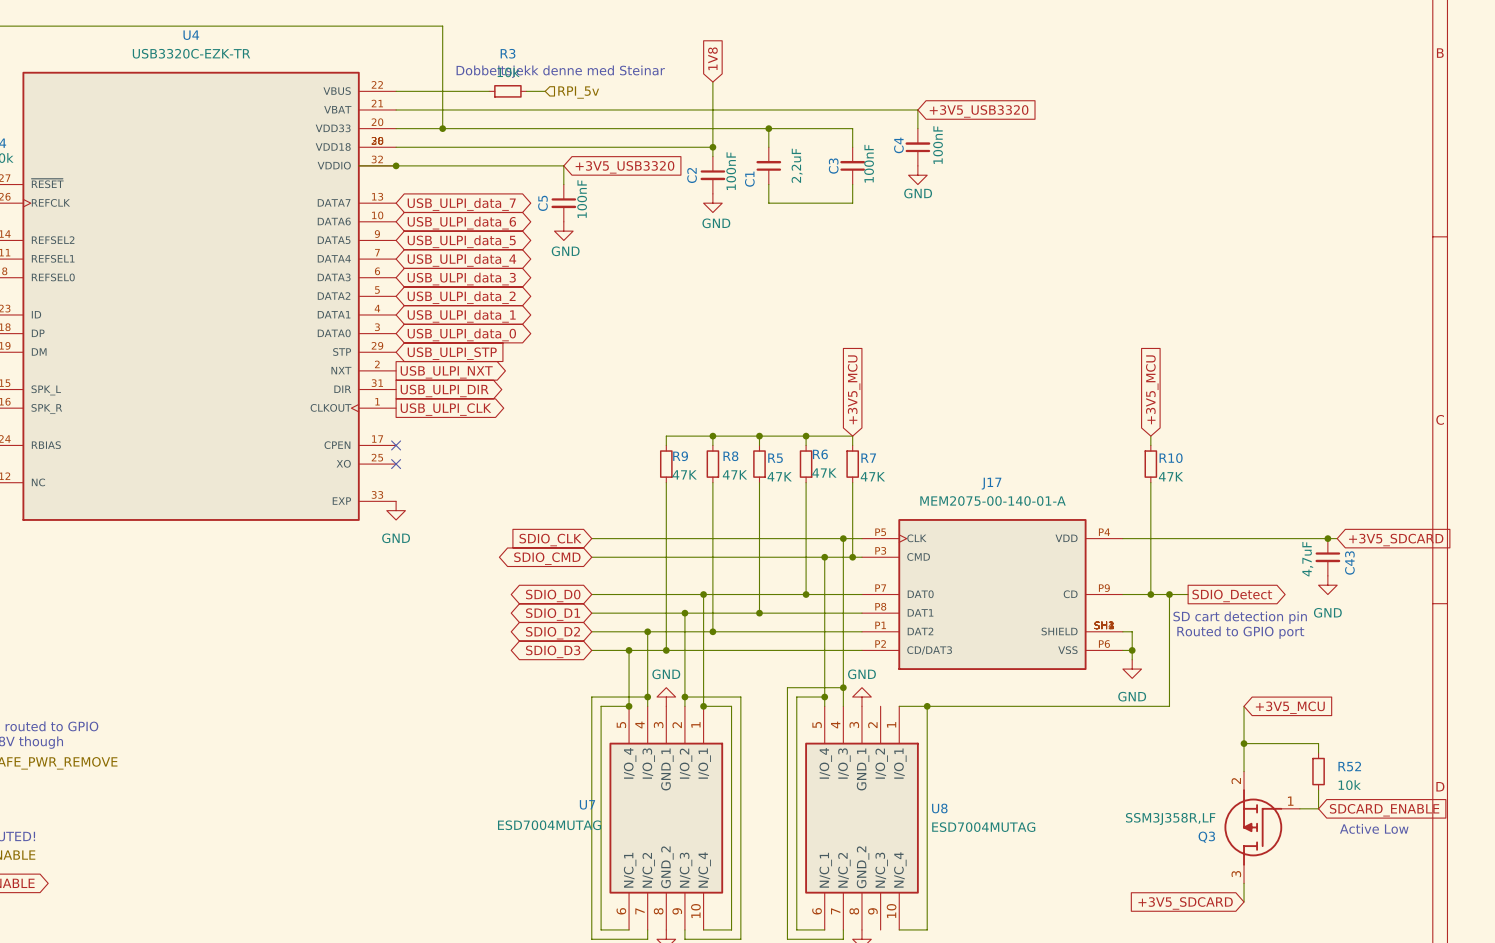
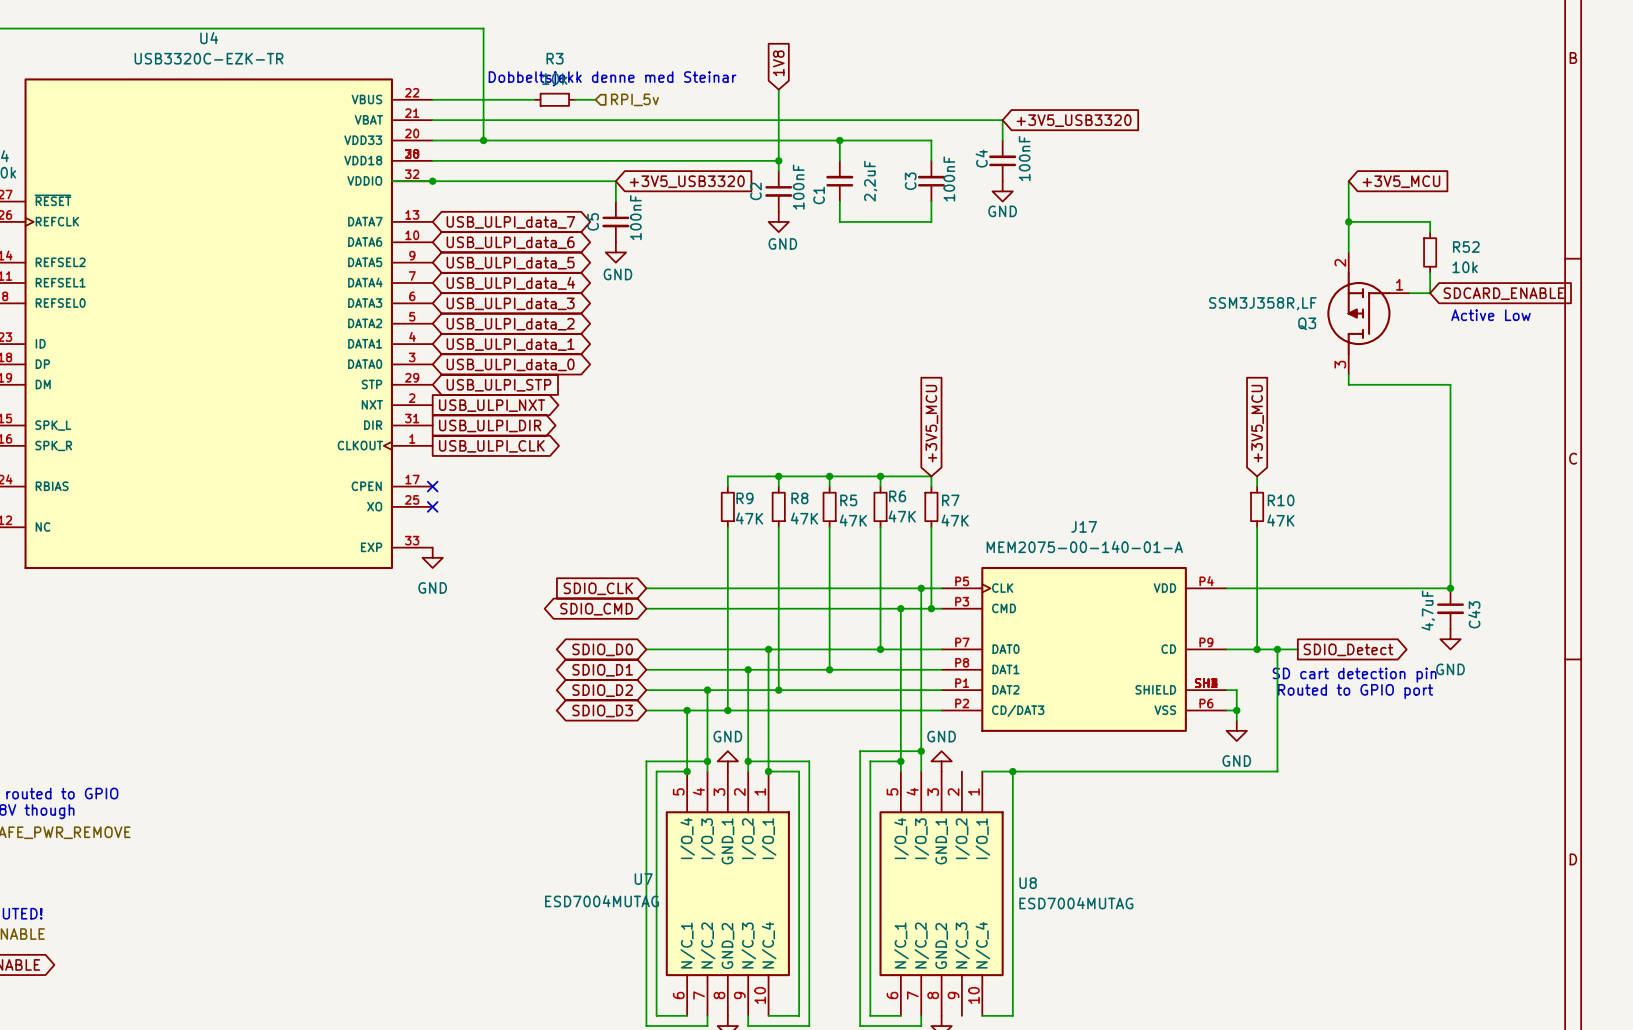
wire: none -> (1348, 181) (1348, 252)
global label: none -> +3V5_MCU (1401, 181)
wire: none -> (1348, 221) (1430, 221) (1430, 232)
junction: none -> (1348, 221)
wire: none -> (1430, 272) (1430, 293) (1409, 293)
global label: none -> SDCARD_ENABLE (1503, 293)
text: none -> Active Low (1490, 315)
wire: (1327, 538) (1337, 538) -> (1450, 588) (1450, 384) (1348, 384) (1348, 374)
global label: +3V5_SDCARD (1396, 540) -> none
wire: (1244, 706) (1244, 771) -> none
global label: +3V5_MCU (1290, 707) -> none
wire: (1244, 743) (1318, 743) (1318, 752) -> none
junction: (1244, 743) -> none
R52 position: (1318, 771) -> (1430, 252)
wire: (1318, 790) (1318, 808) (1299, 808) -> none
global label: SDCARD_ENABLE (1384, 810) -> none
Q3 position: (1262, 827) -> (1368, 313)
text: Active Low (1374, 828) -> none
wire: (1244, 883) (1244, 902) -> none
global label: +3V5_SDCARD (1185, 903) -> none

